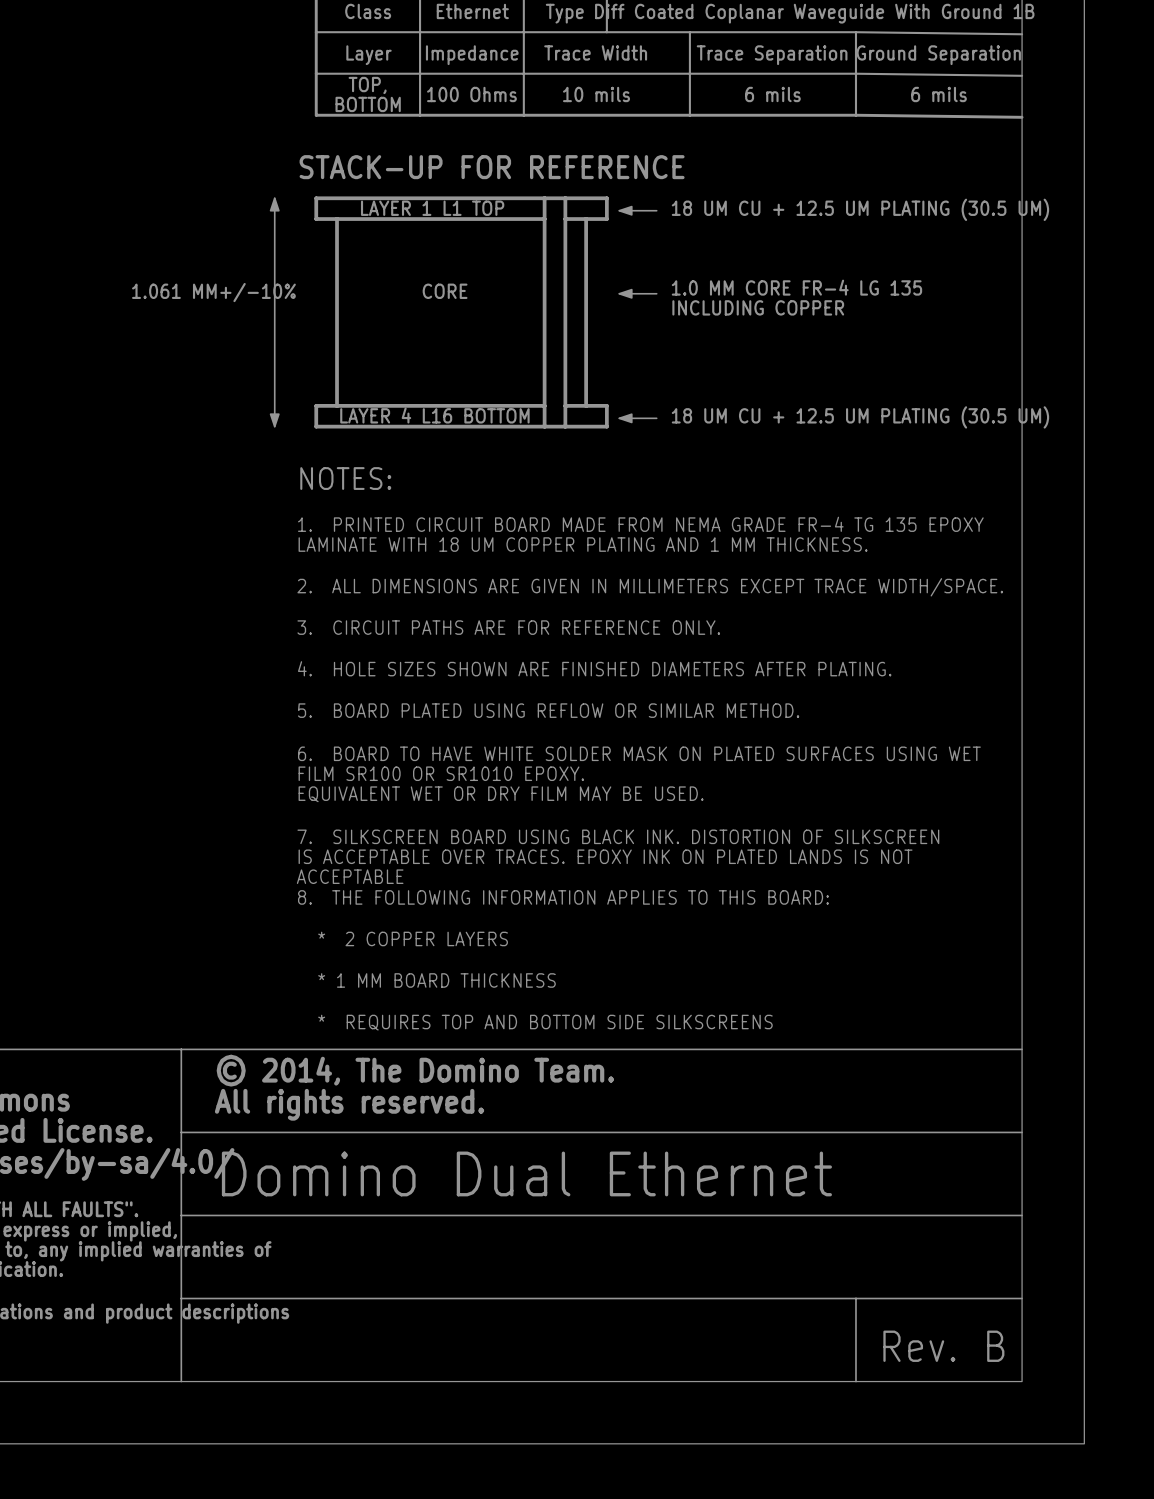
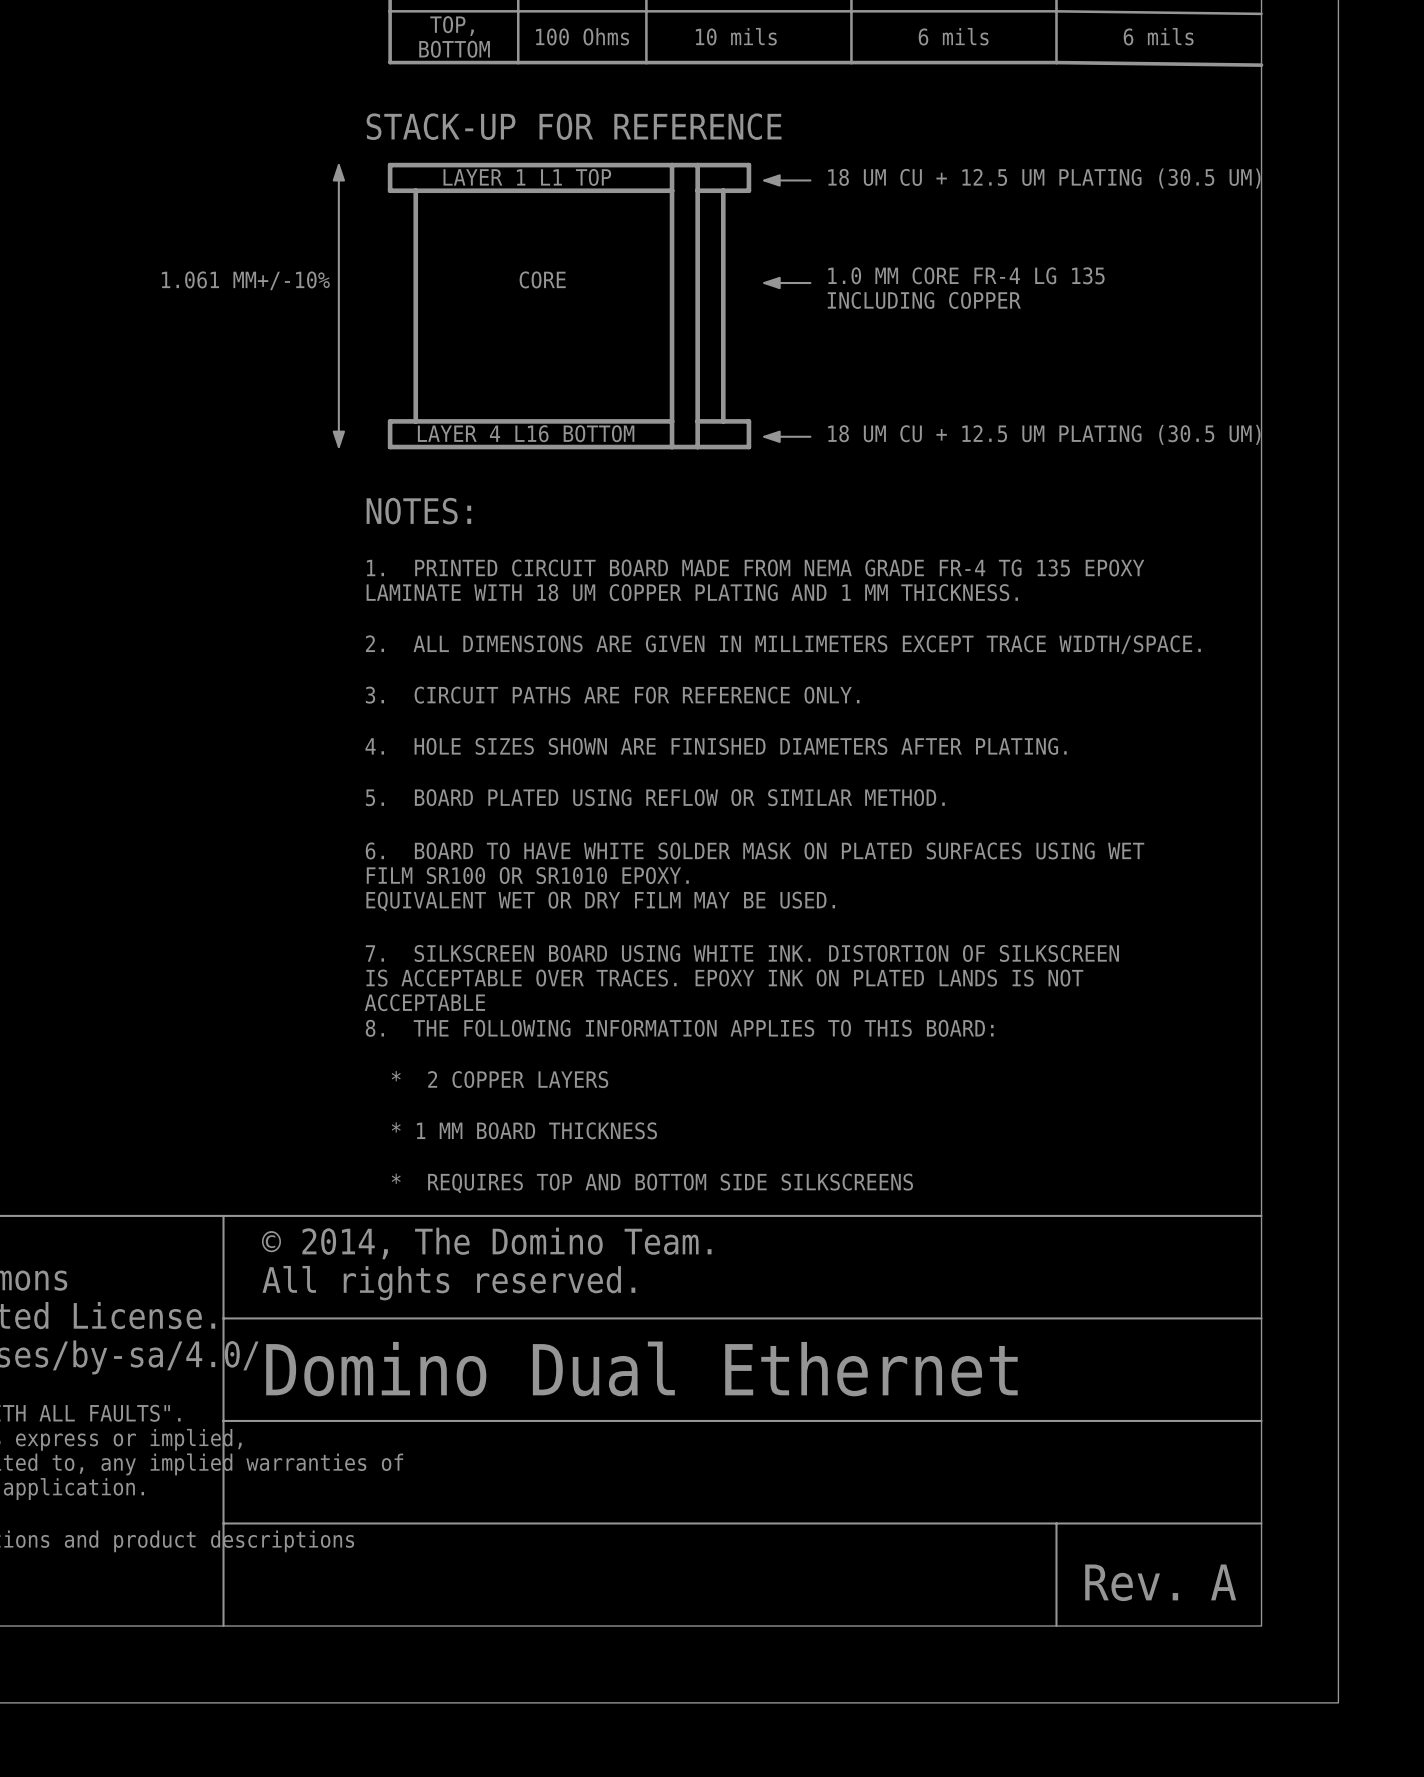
text: 7. SILKSCREEN BOARD USING BLACK INK. DISTORTION OF SILKSCREEN (618, 836) -> 7. SILKSCREEN BOARD USING WHITE INK. DISTORTION OF SILKSCREEN (742, 953)
text: B (995, 1346) -> A (1223, 1582)

